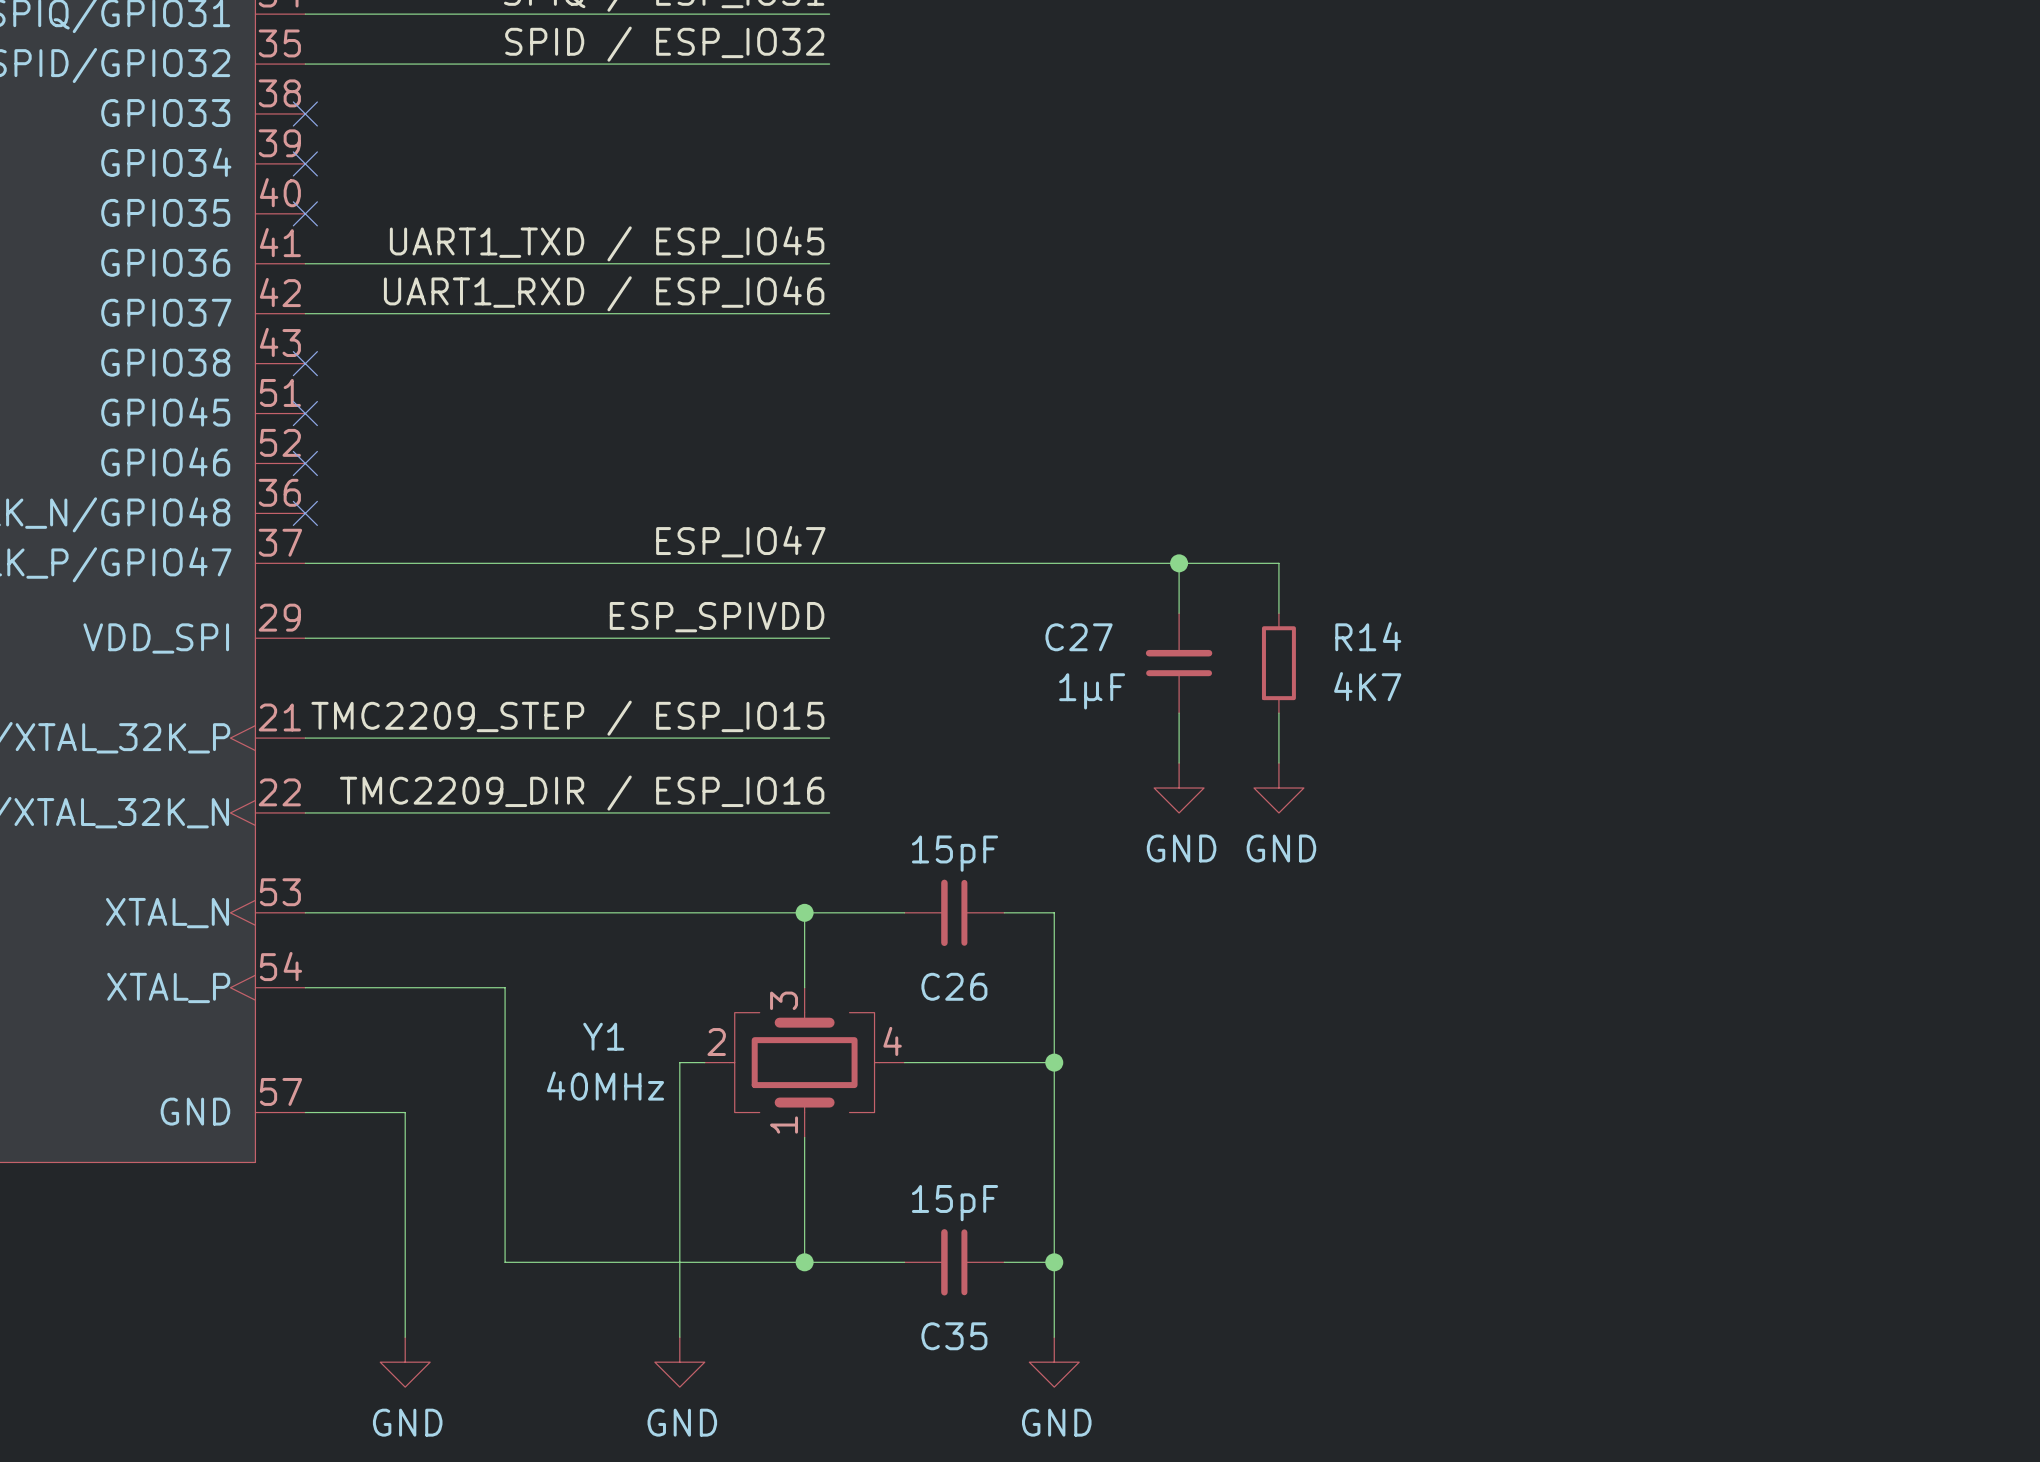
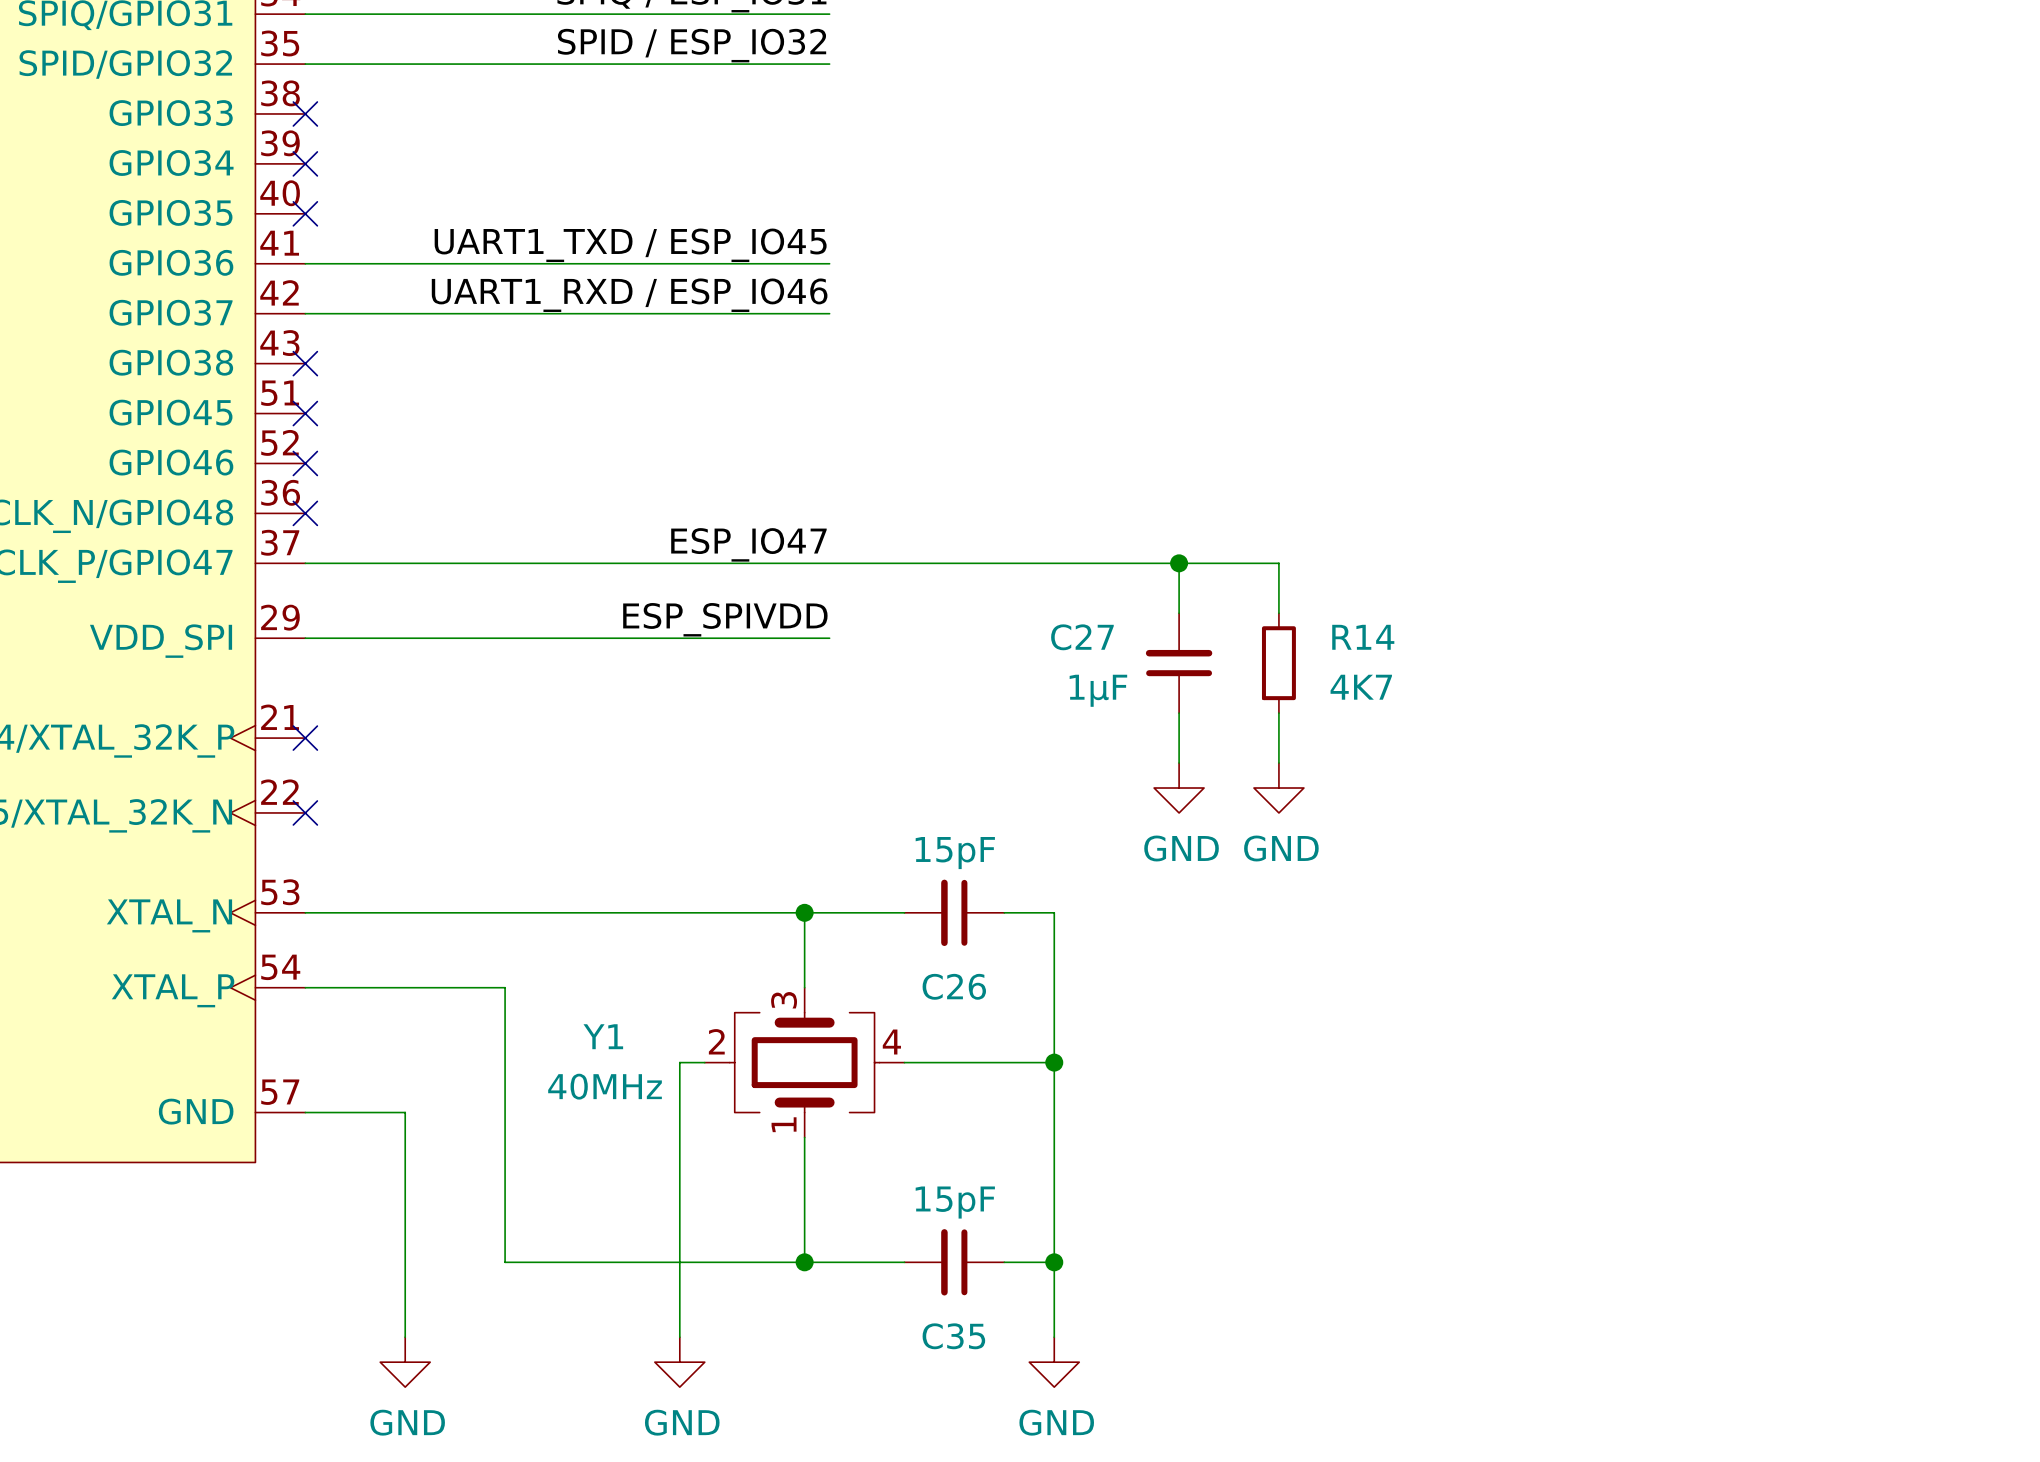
label: TMC2209_STEP / ESP_IO15 (567, 718) -> none
wire: (305, 738) (829, 738) -> none
no-connect mark: none -> (305, 738)
label: TMC2209_DIR / ESP_IO16 (582, 793) -> none
wire: (305, 812) (829, 812) -> none
no-connect mark: none -> (305, 812)

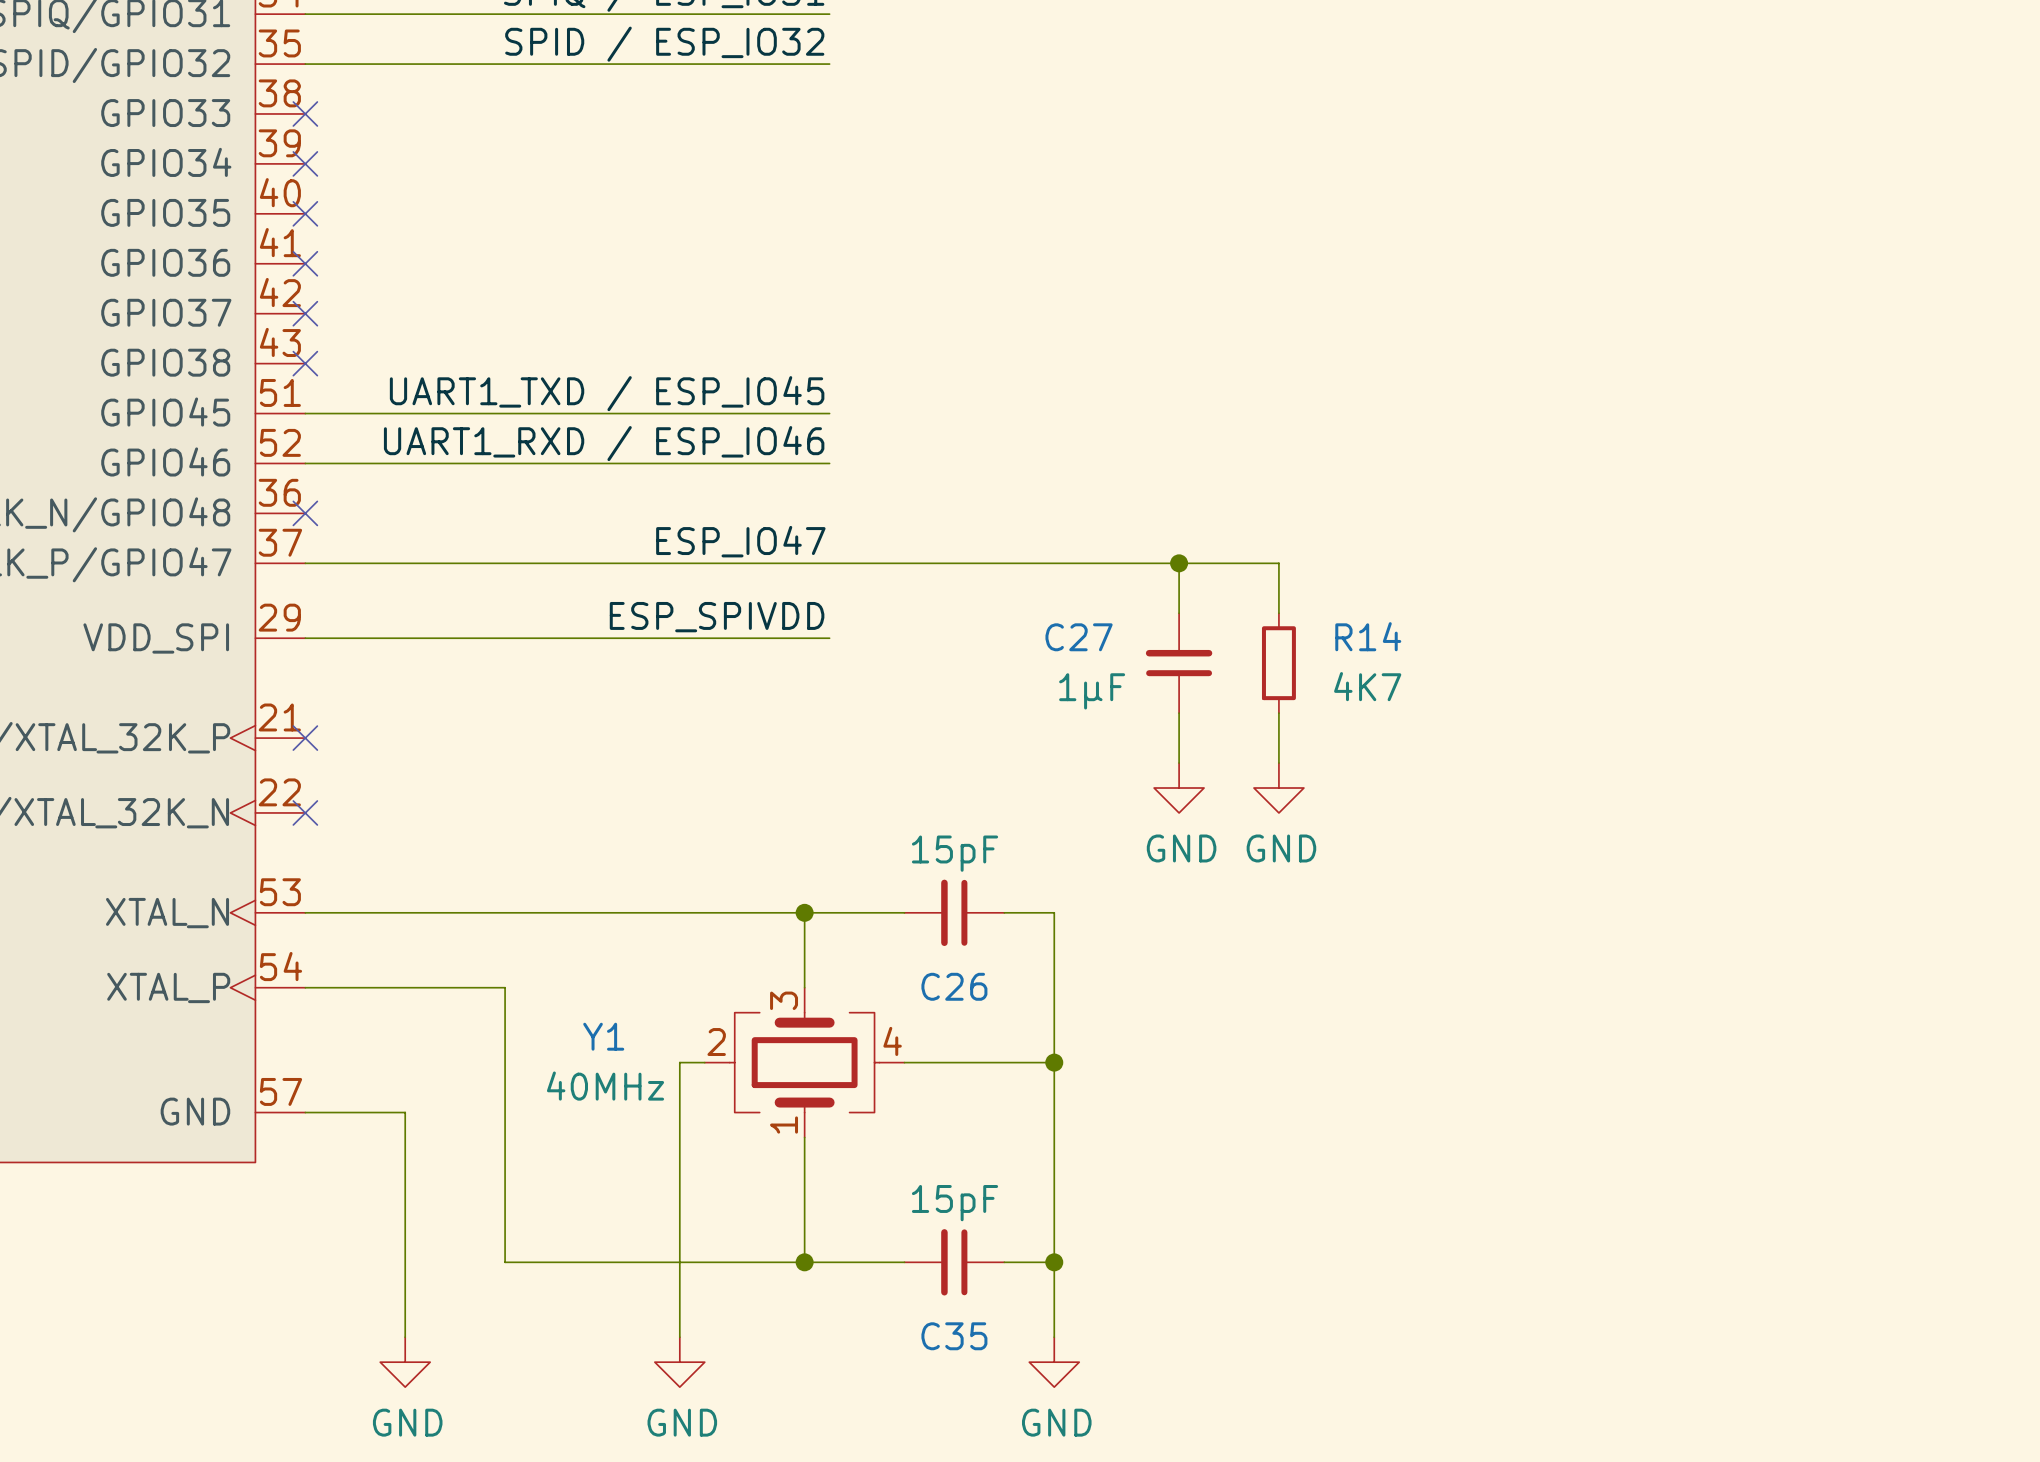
label position: UART1_TXD / ESP_IO45 (630, 245) -> UART1_TXD / ESP_IO45 (607, 393)
wire: (305, 263) (829, 263) -> (305, 463) (829, 463)
no-connect mark: none -> (305, 263)
label position: UART1_RXD / ESP_IO46 (629, 295) -> UART1_RXD / ESP_IO46 (604, 443)
wire: (305, 313) (829, 313) -> (305, 413) (829, 413)
no-connect mark: none -> (305, 313)
no-connect mark: (305, 413) -> none
no-connect mark: (305, 463) -> none

